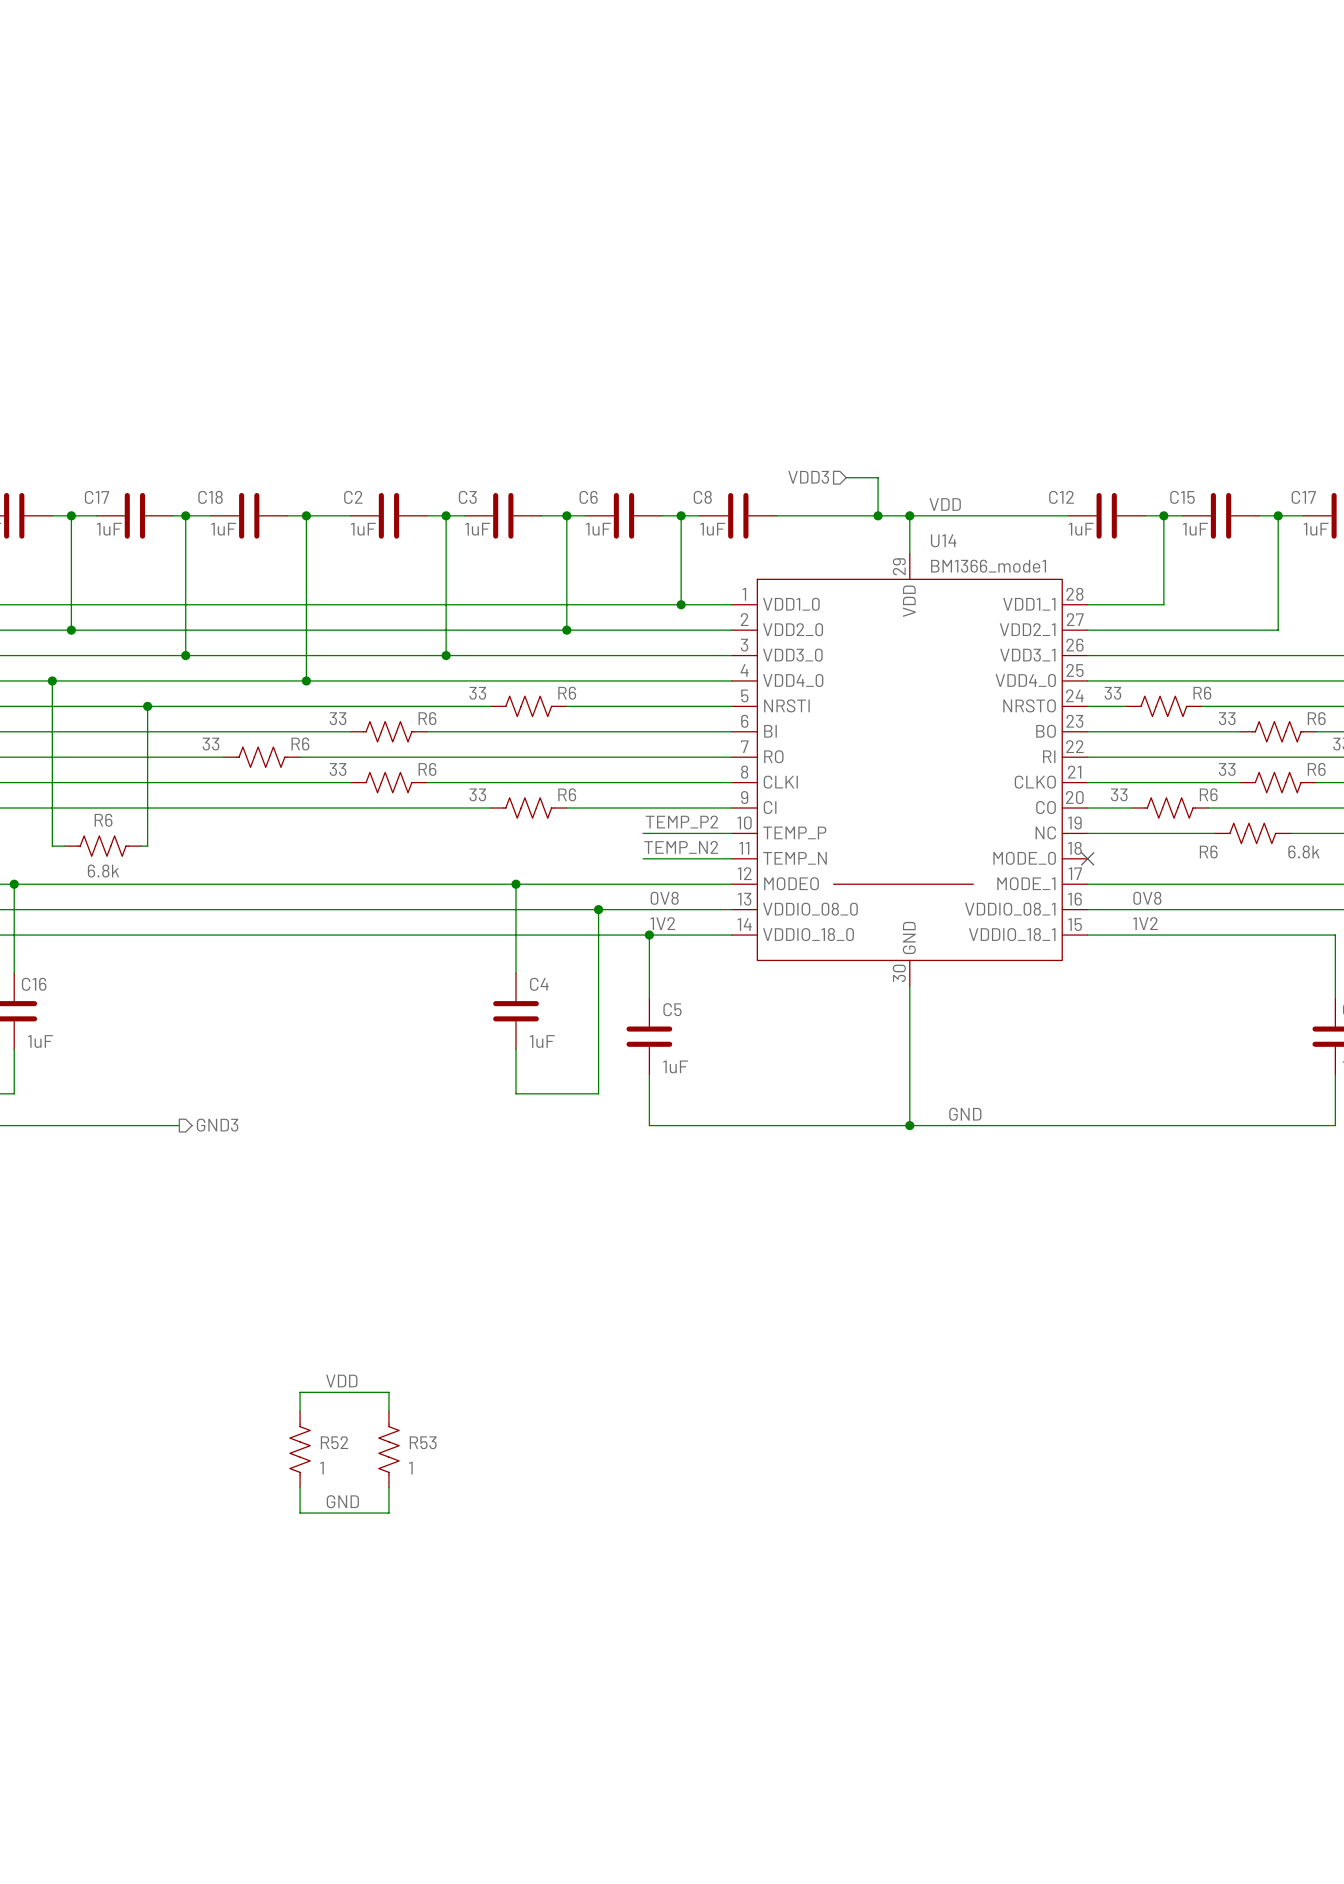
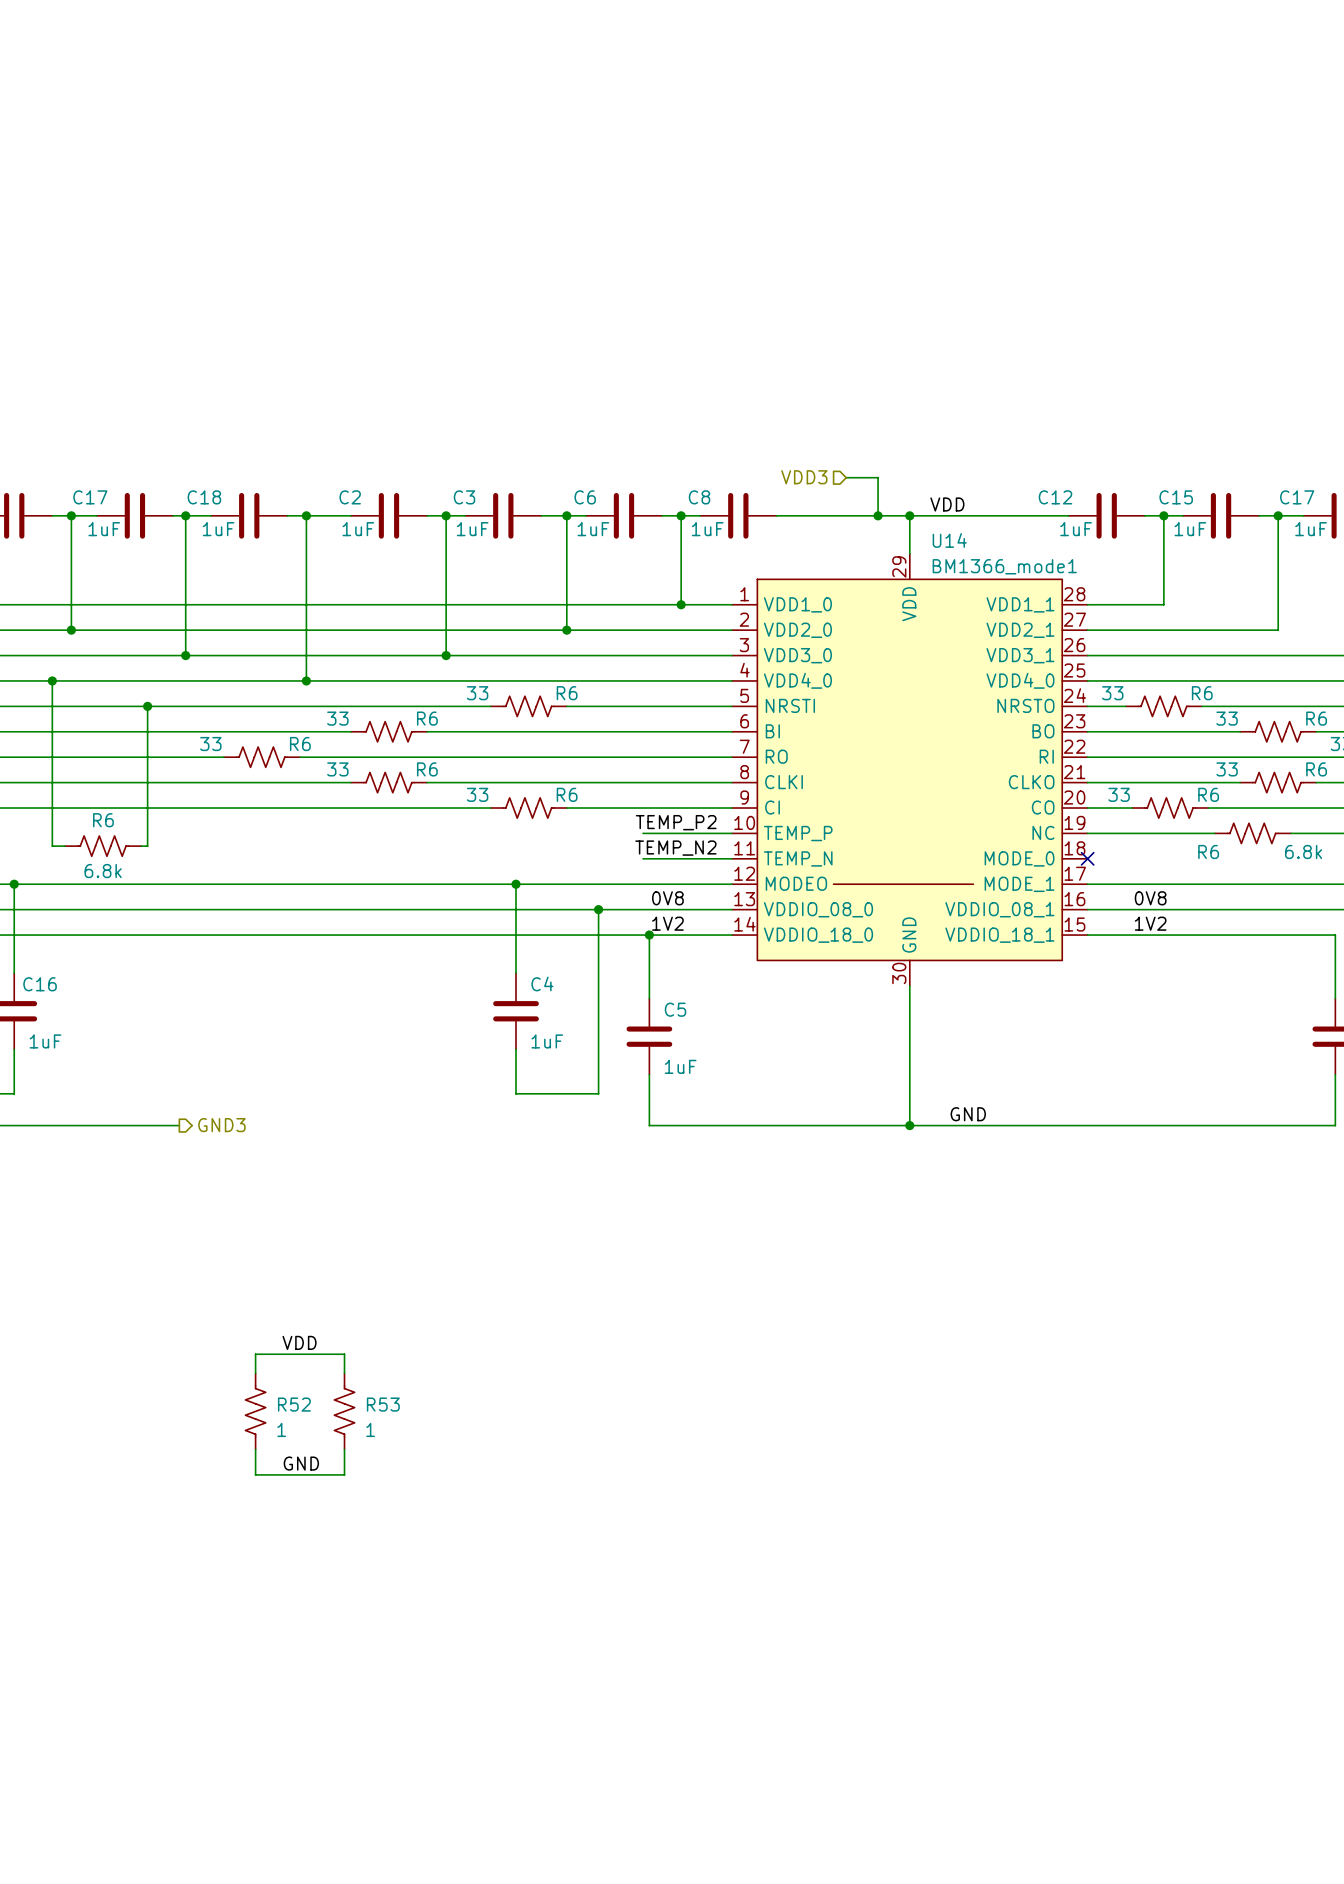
label position: VDD (341, 1381) -> VDD (299, 1342)
wire: (300, 1411) (300, 1392) (388, 1392) (388, 1411) -> (255, 1373) (255, 1354) (344, 1354) (344, 1373)
R52 position: (300, 1449) -> (255, 1411)
R53 position: (388, 1449) -> (344, 1411)
wire: (300, 1487) (300, 1513) (388, 1513) (388, 1487) -> (255, 1449) (255, 1474) (344, 1474) (344, 1449)
label position: GND (342, 1501) -> GND (301, 1463)

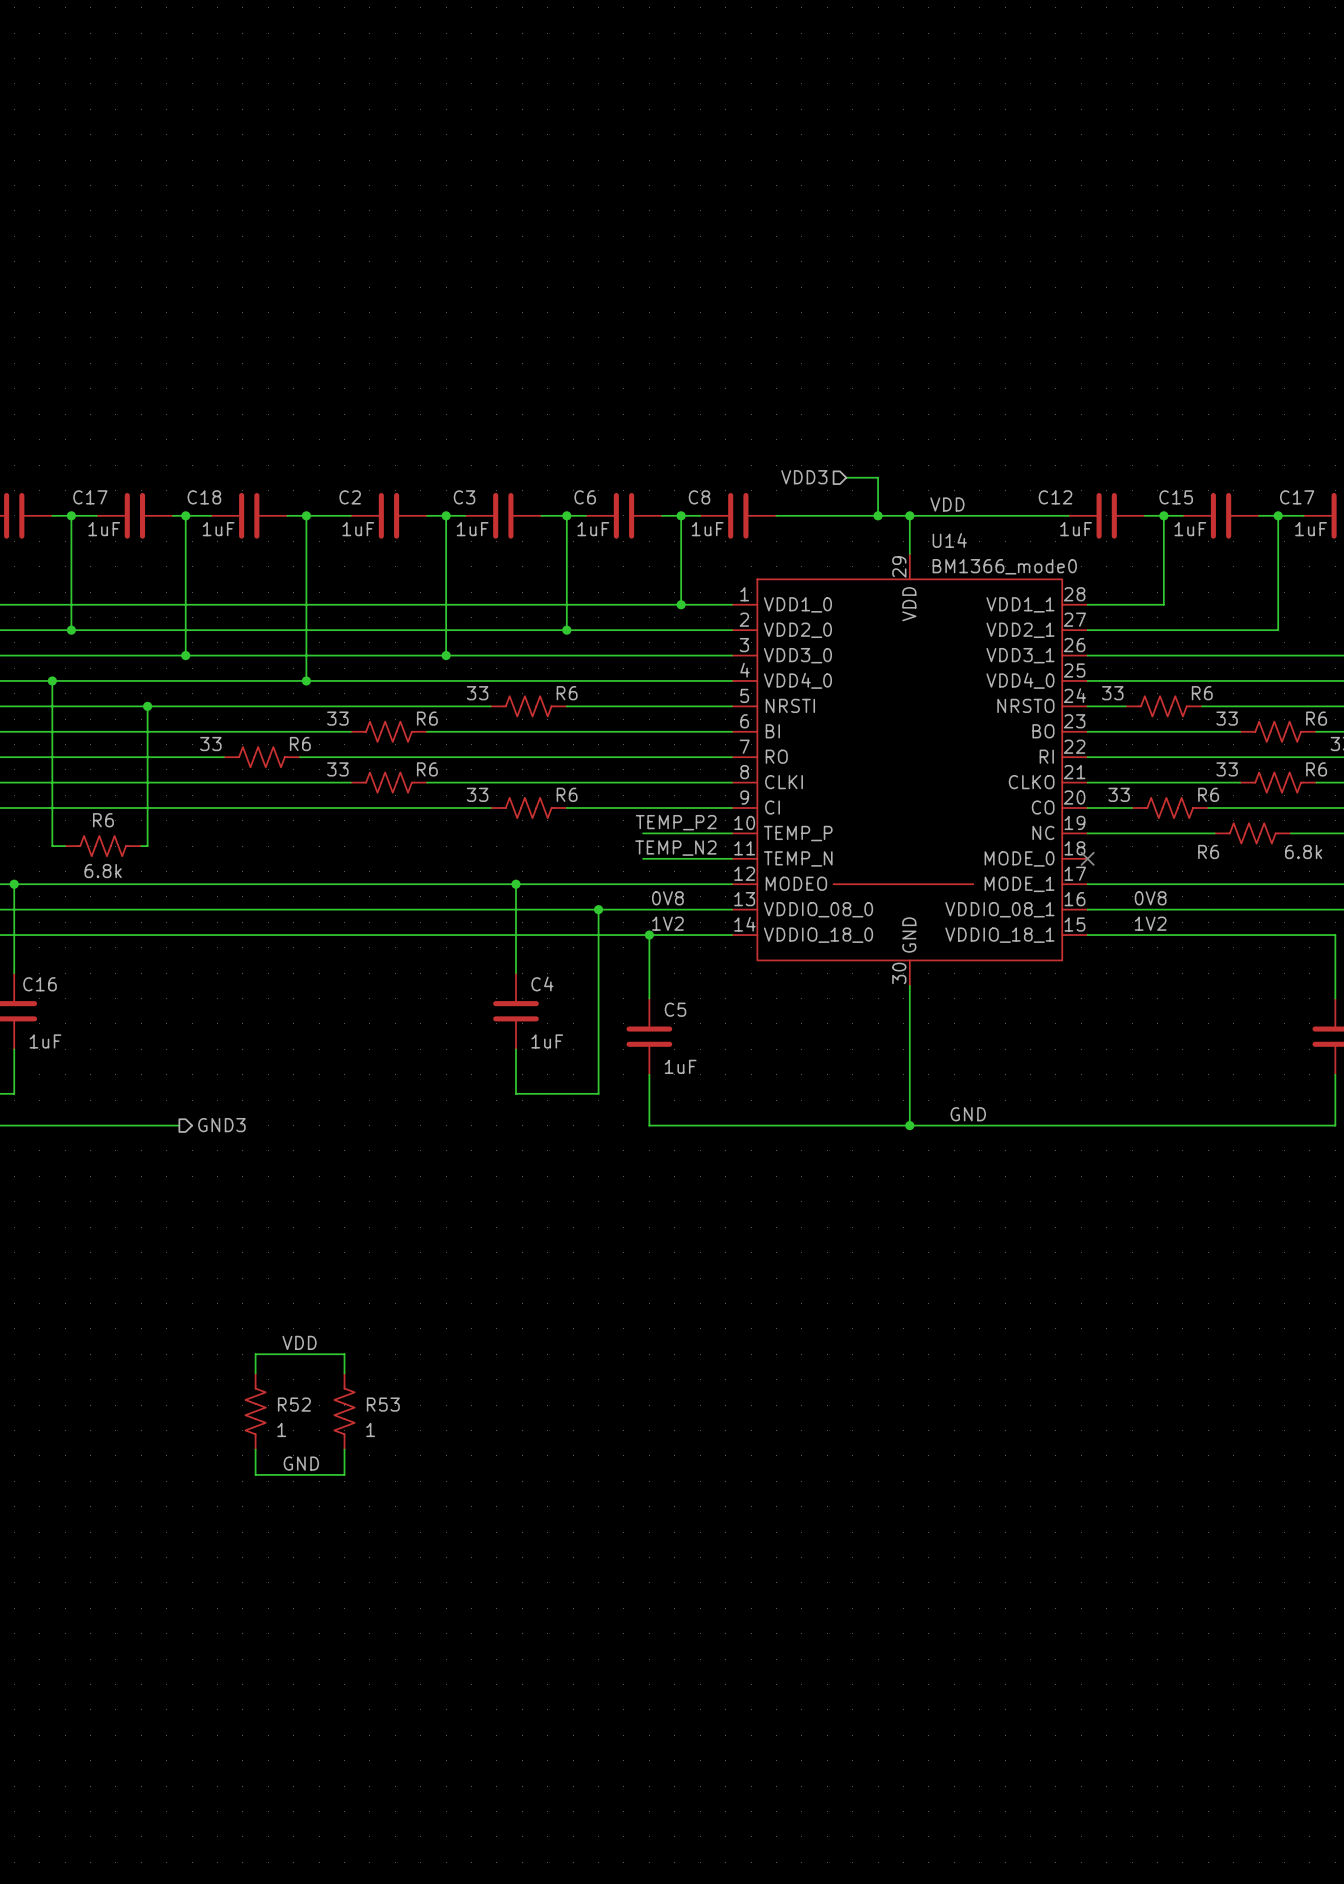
U14 value: BM1366_mode1 (1004, 566) -> BM1366_mode0 (1004, 566)

